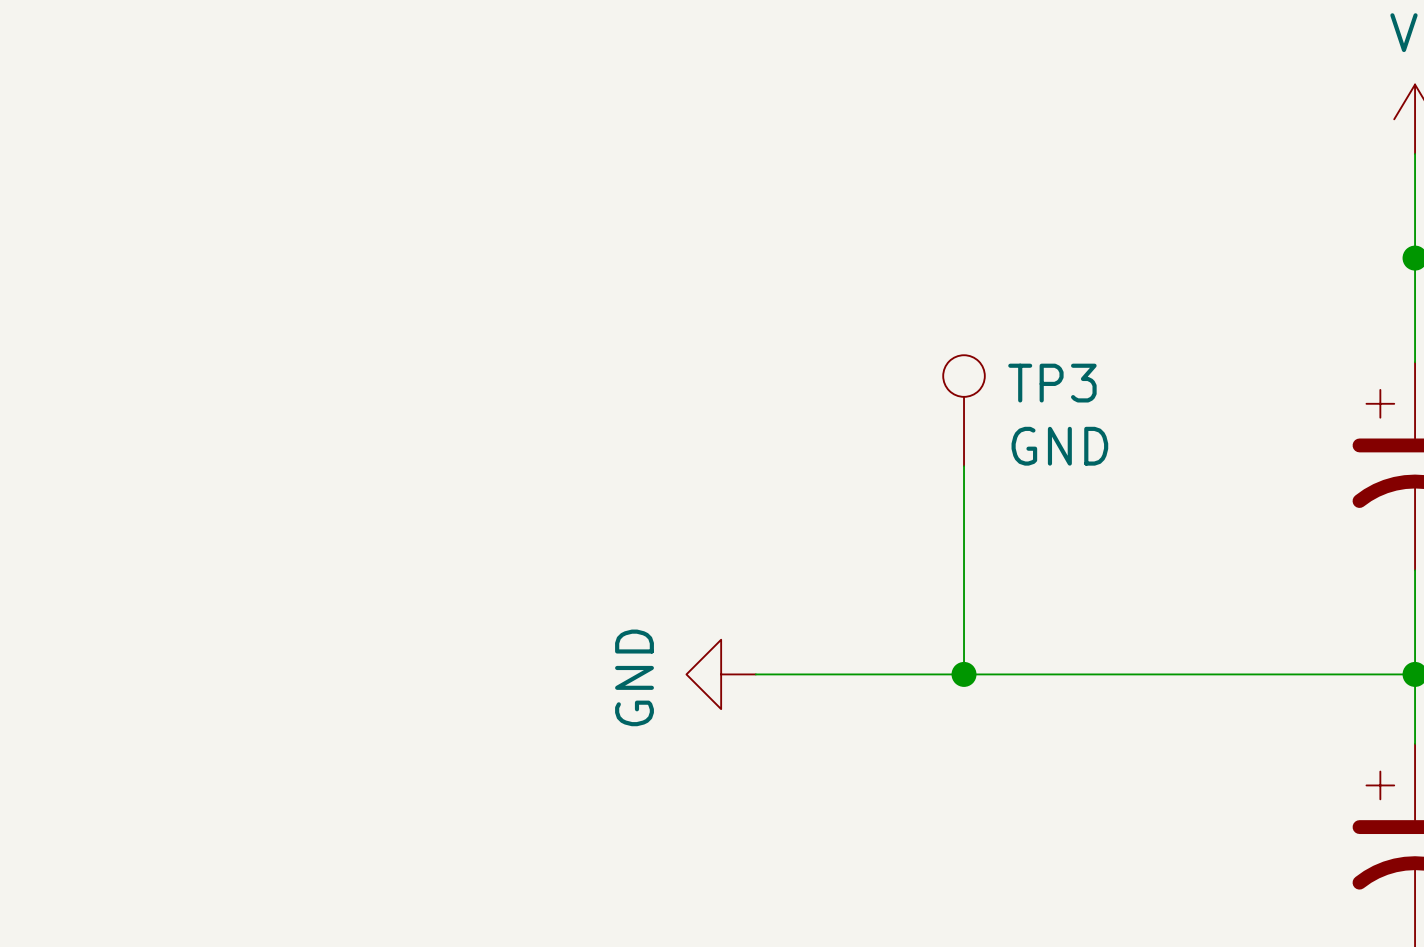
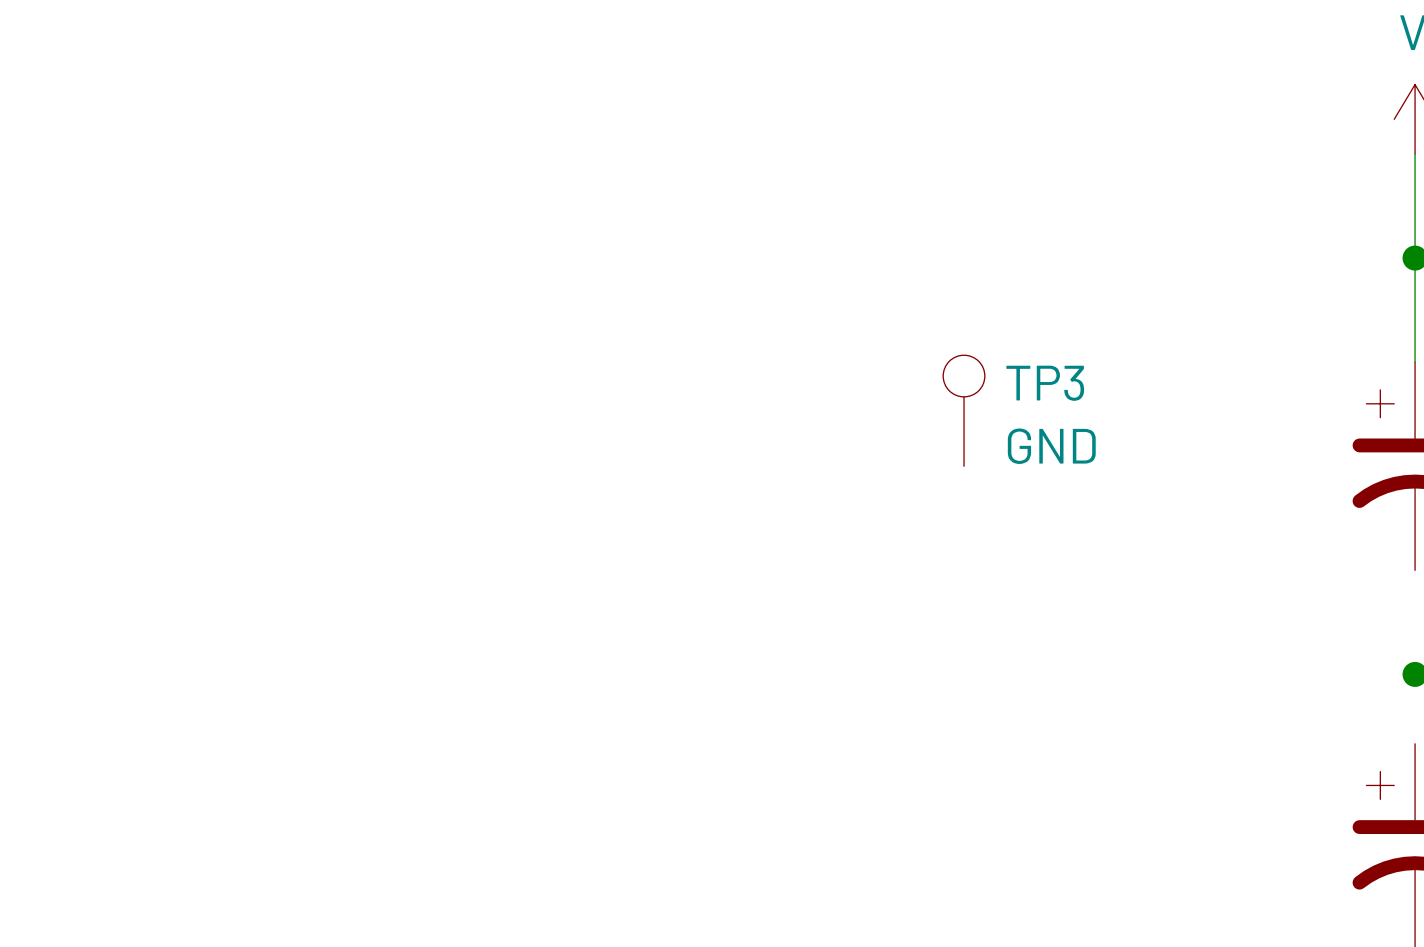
wire: (964, 466) (964, 674) -> none
wire: (1415, 570) (1415, 743) -> none
power symbol: GND (721, 674) -> none
wire: (755, 674) (1415, 674) -> none
junction: (964, 674) -> none

